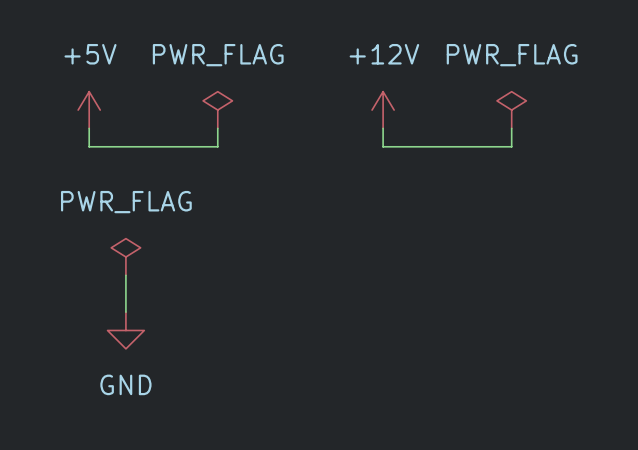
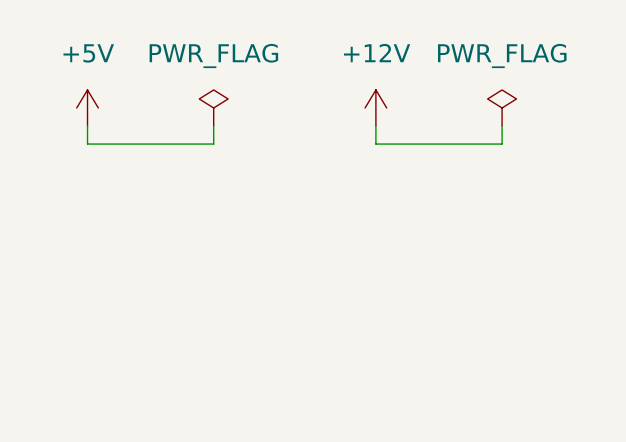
power symbol: PWR_FLAG (125, 257) -> none
wire: (125, 275) (125, 312) -> none
power symbol: GND (125, 330) -> none

